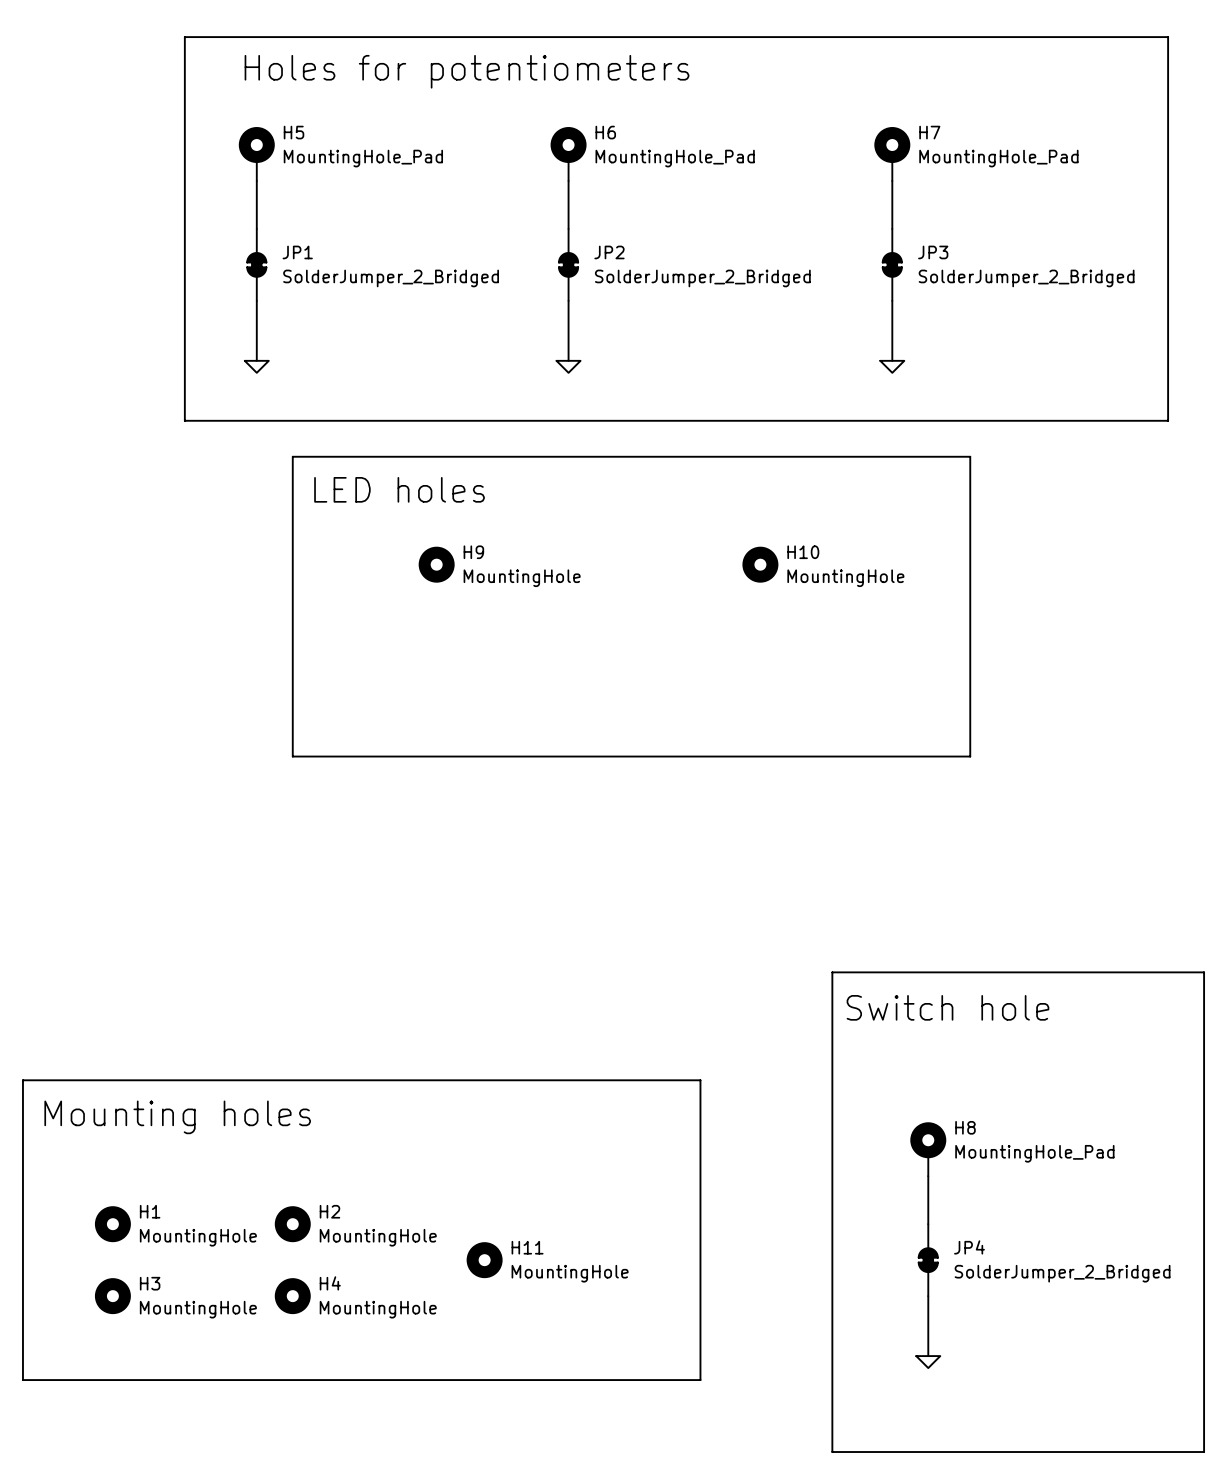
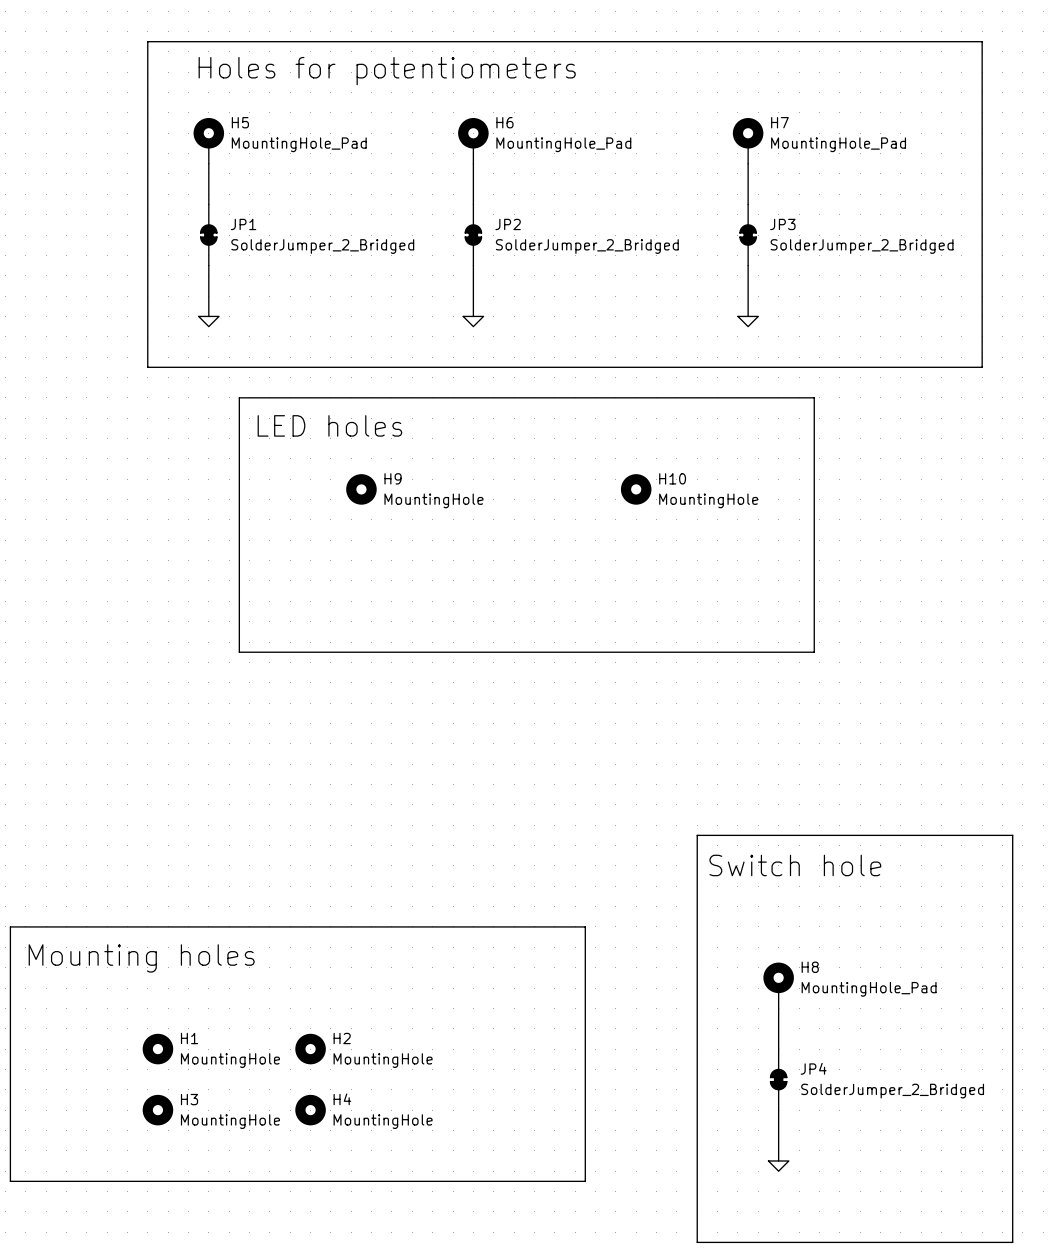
H1 position: (112, 1224) -> (157, 1049)
H2 position: (292, 1224) -> (310, 1049)
H11: MountingHole (484, 1260) -> none
H3 position: (112, 1296) -> (157, 1110)
H4 position: (292, 1296) -> (310, 1110)

